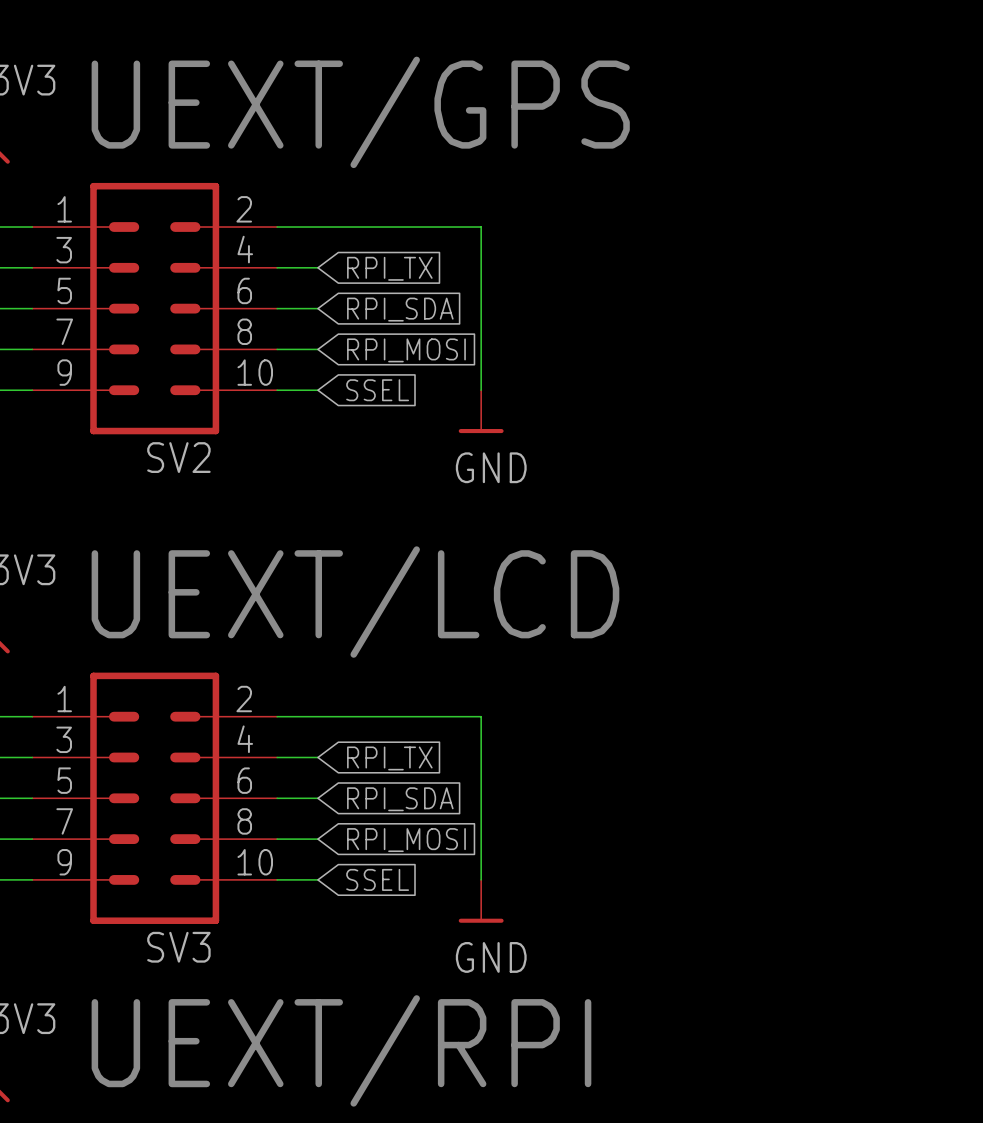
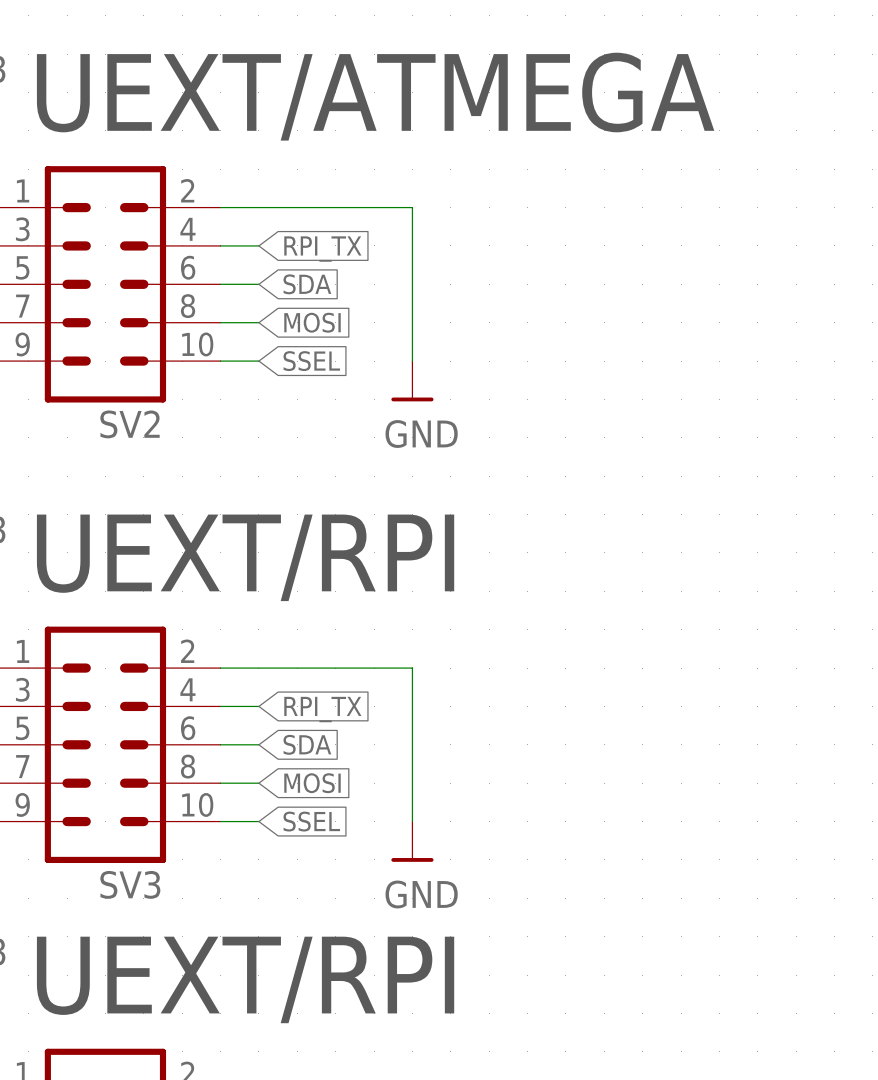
text: UEXT/GPS (360, 112) -> UEXT/ATMEGA (375, 96)
global label: RPI_SDA (400, 309) -> SDA (307, 284)
global label: RPI_MOSI (406, 350) -> MOSI (312, 322)
text: UEXT/LCD (355, 602) -> UEXT/RPI (245, 557)
global label: RPI_SDA (400, 799) -> SDA (307, 744)
global label: RPI_MOSI (406, 840) -> MOSI (312, 783)

